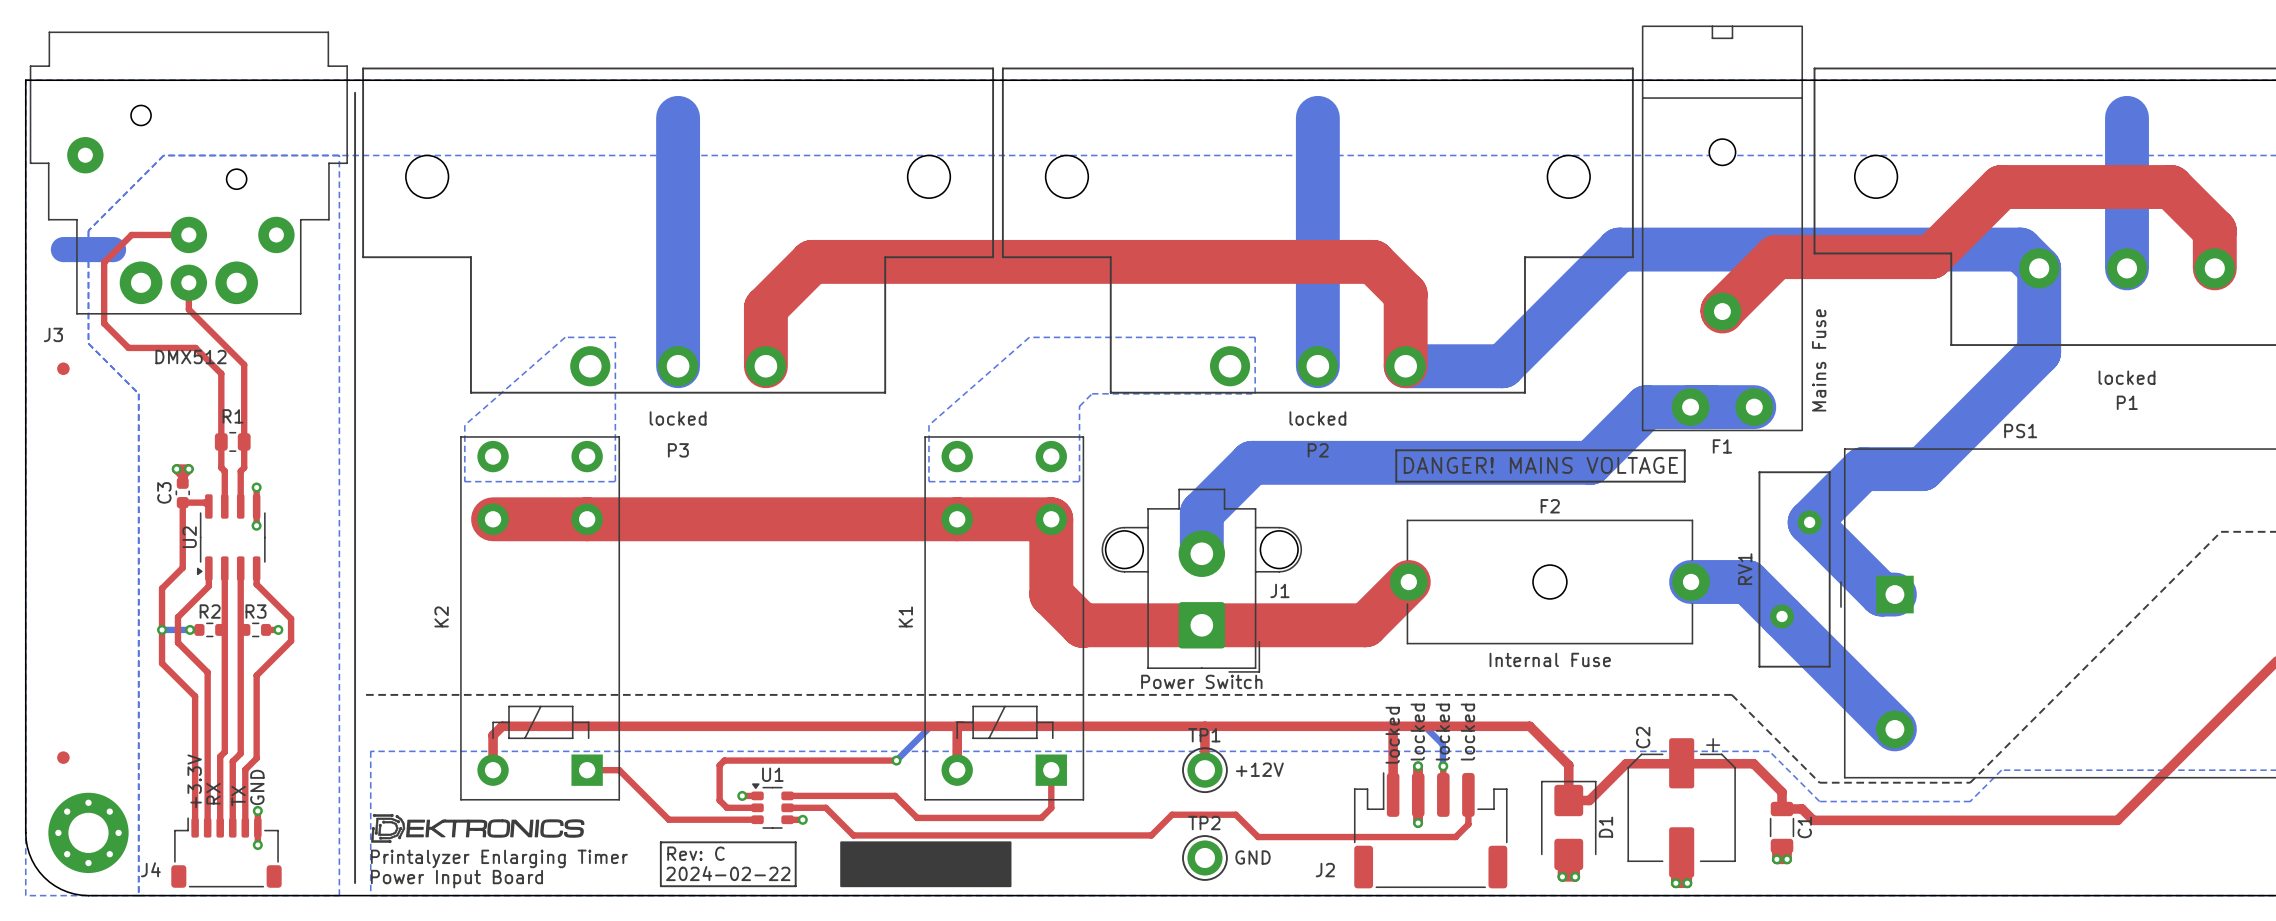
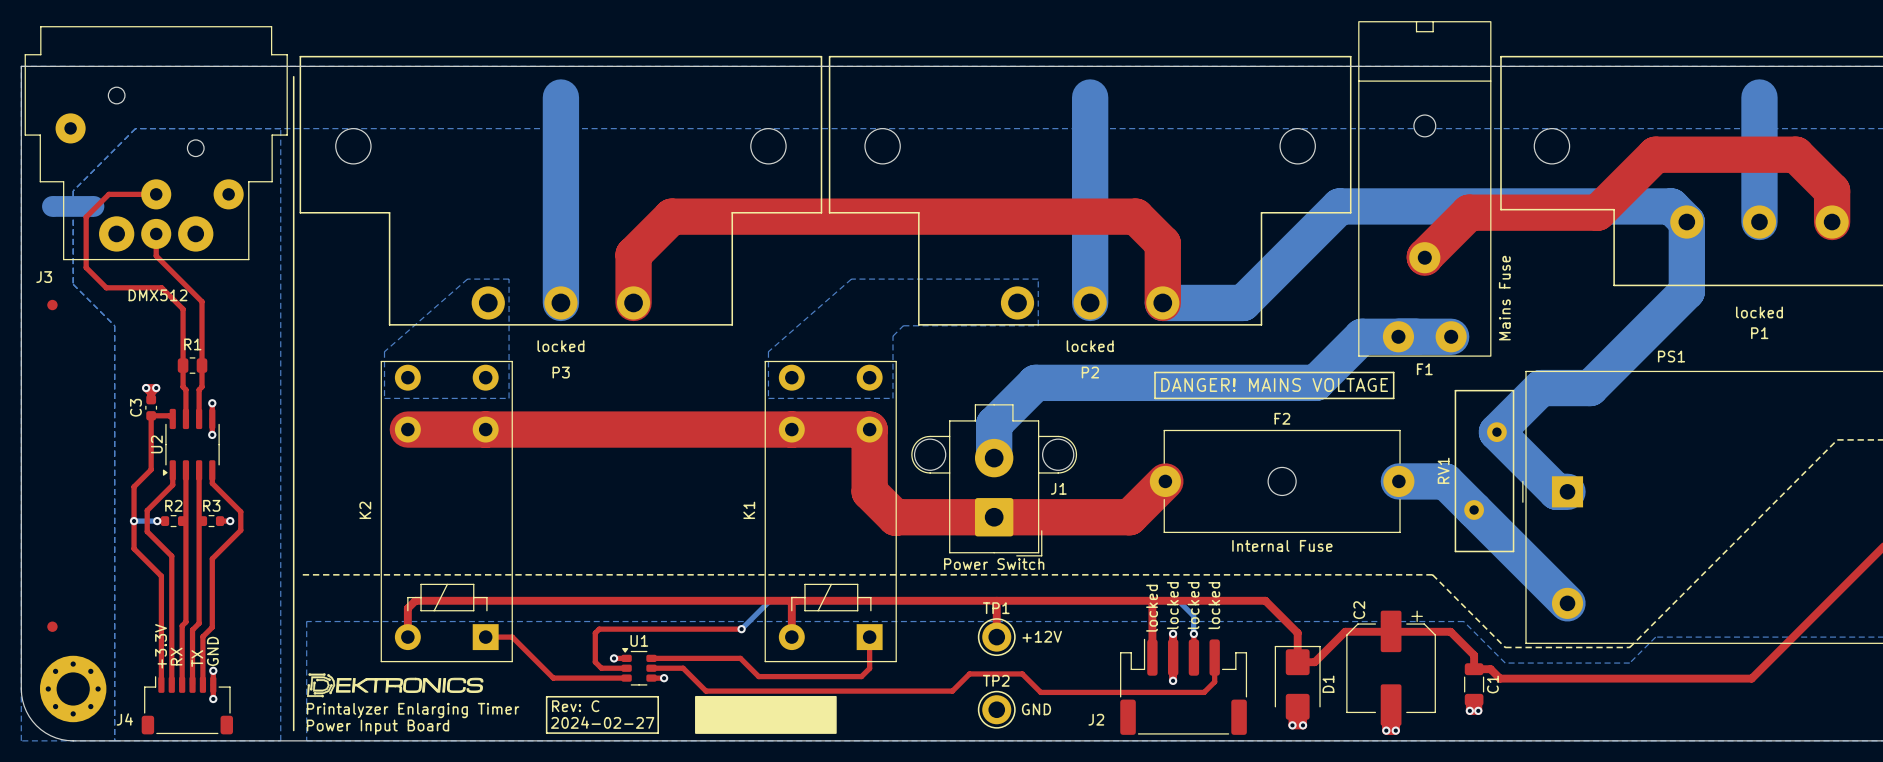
text: 2024-02-22 (728, 873) -> 2024-02-27 (602, 722)

